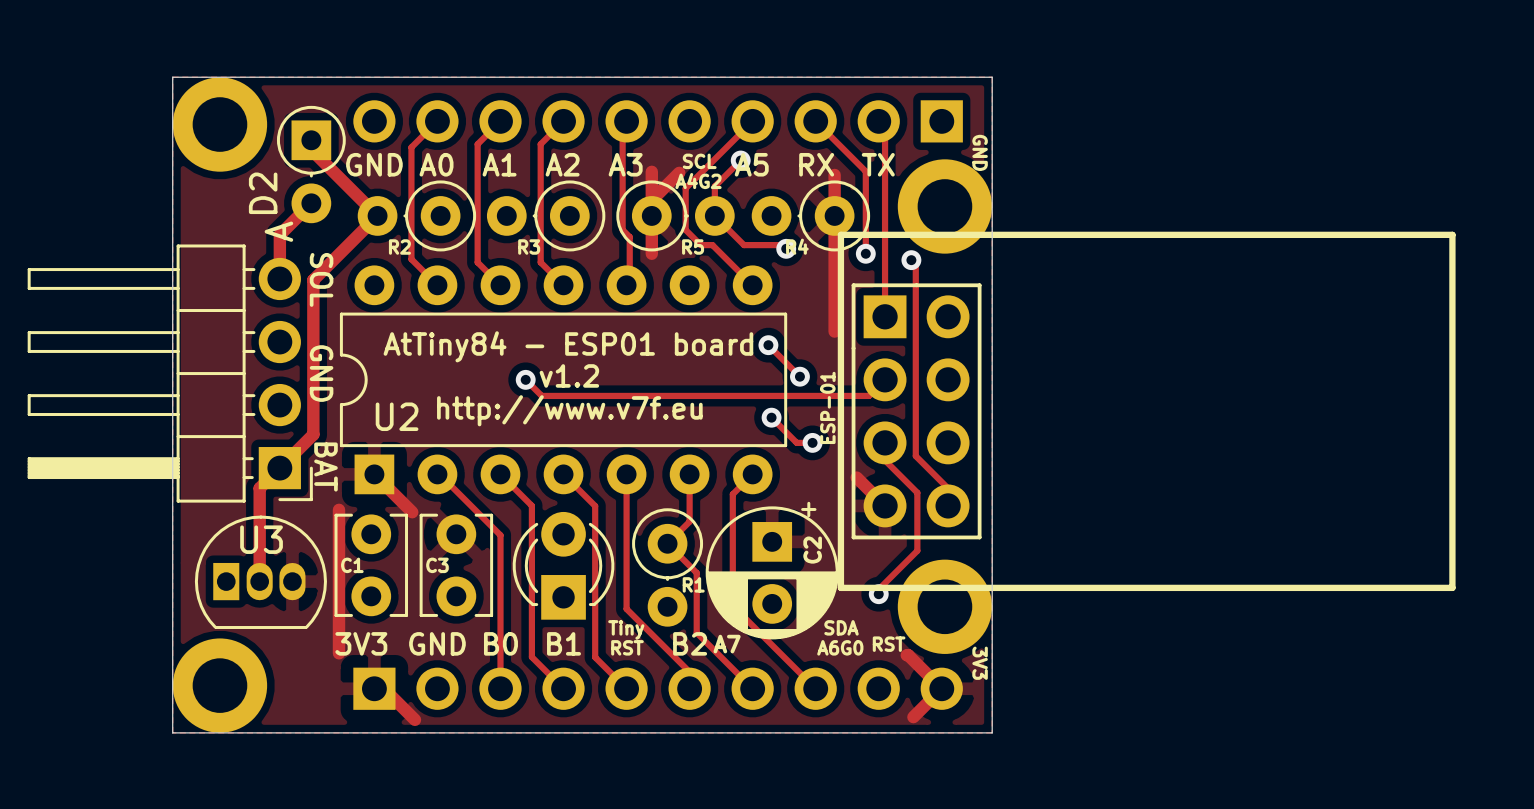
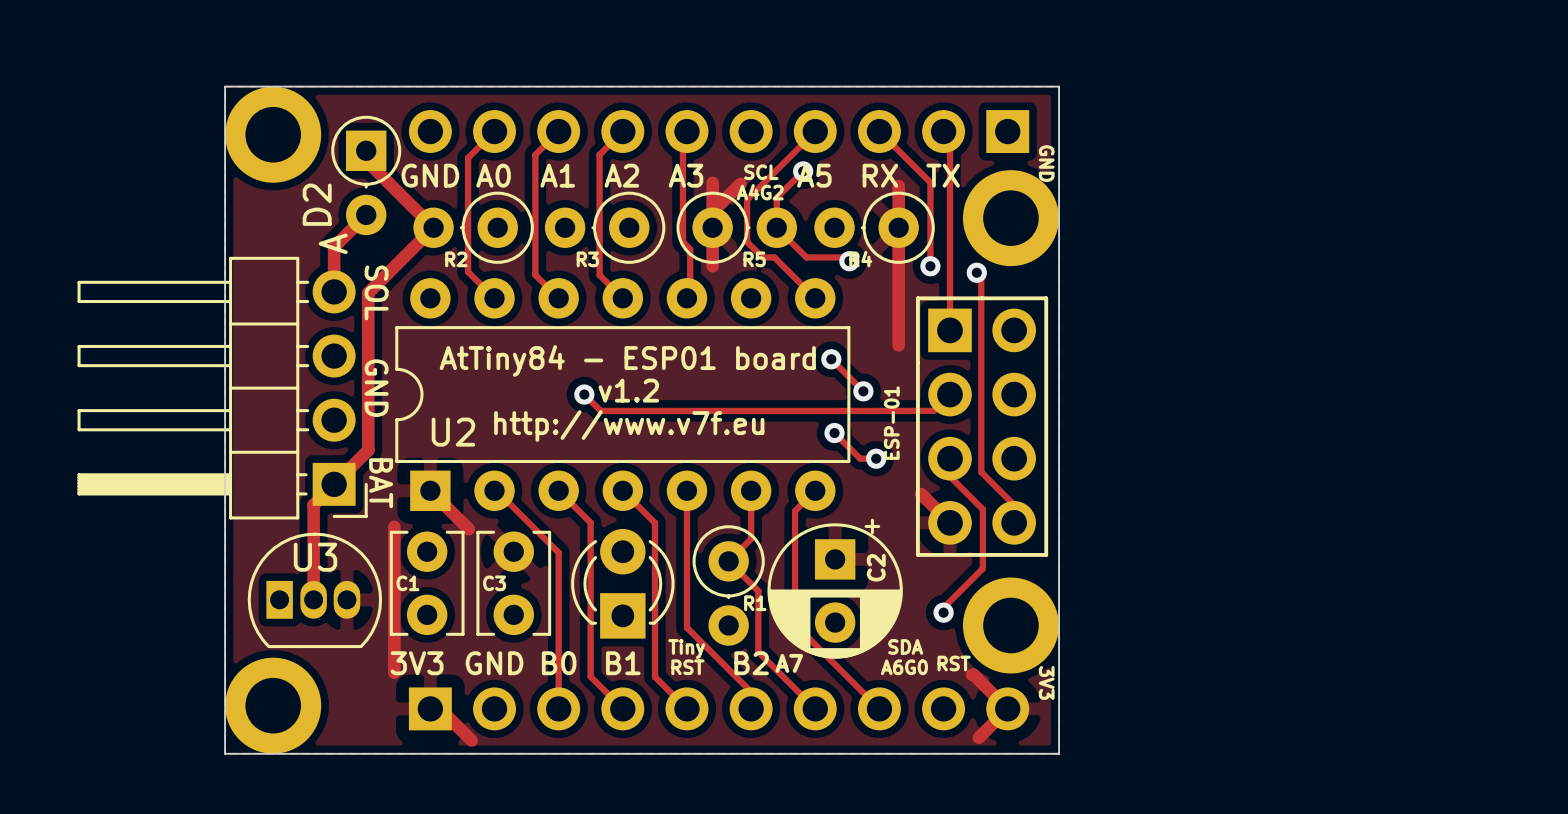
part: (1146, 411) -> none

